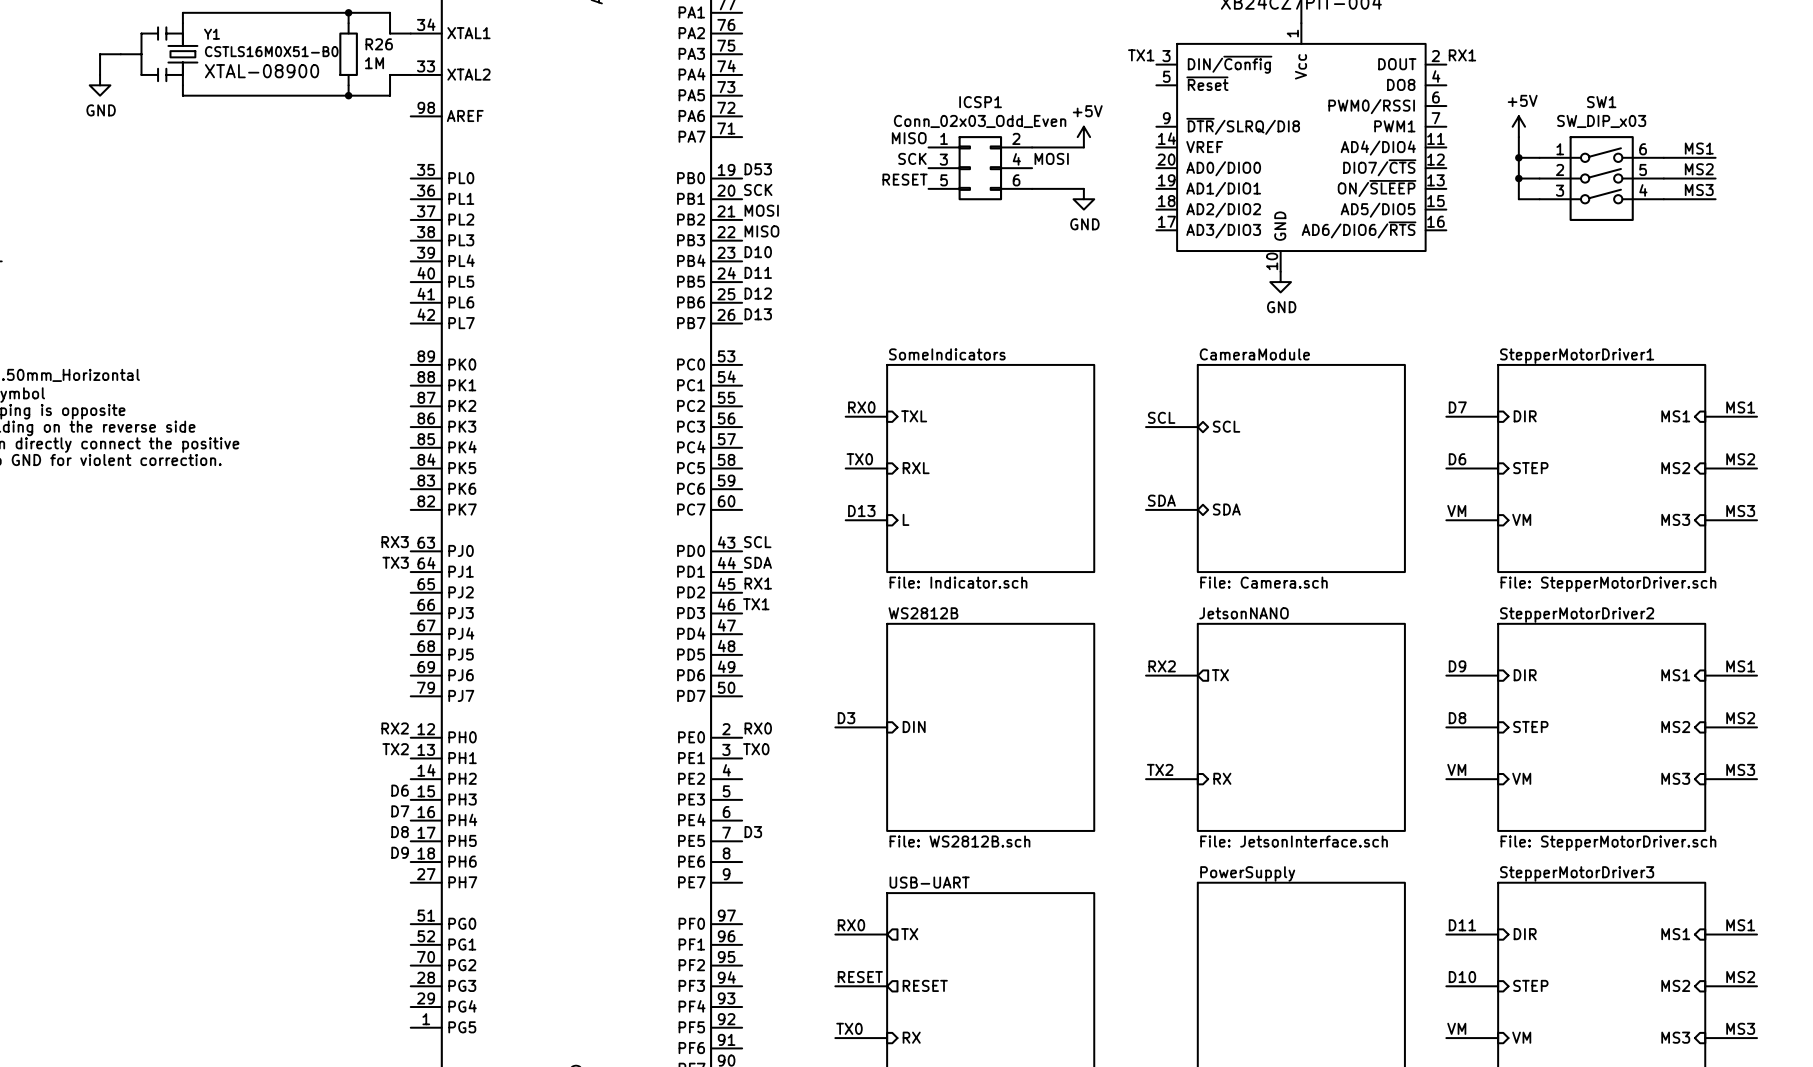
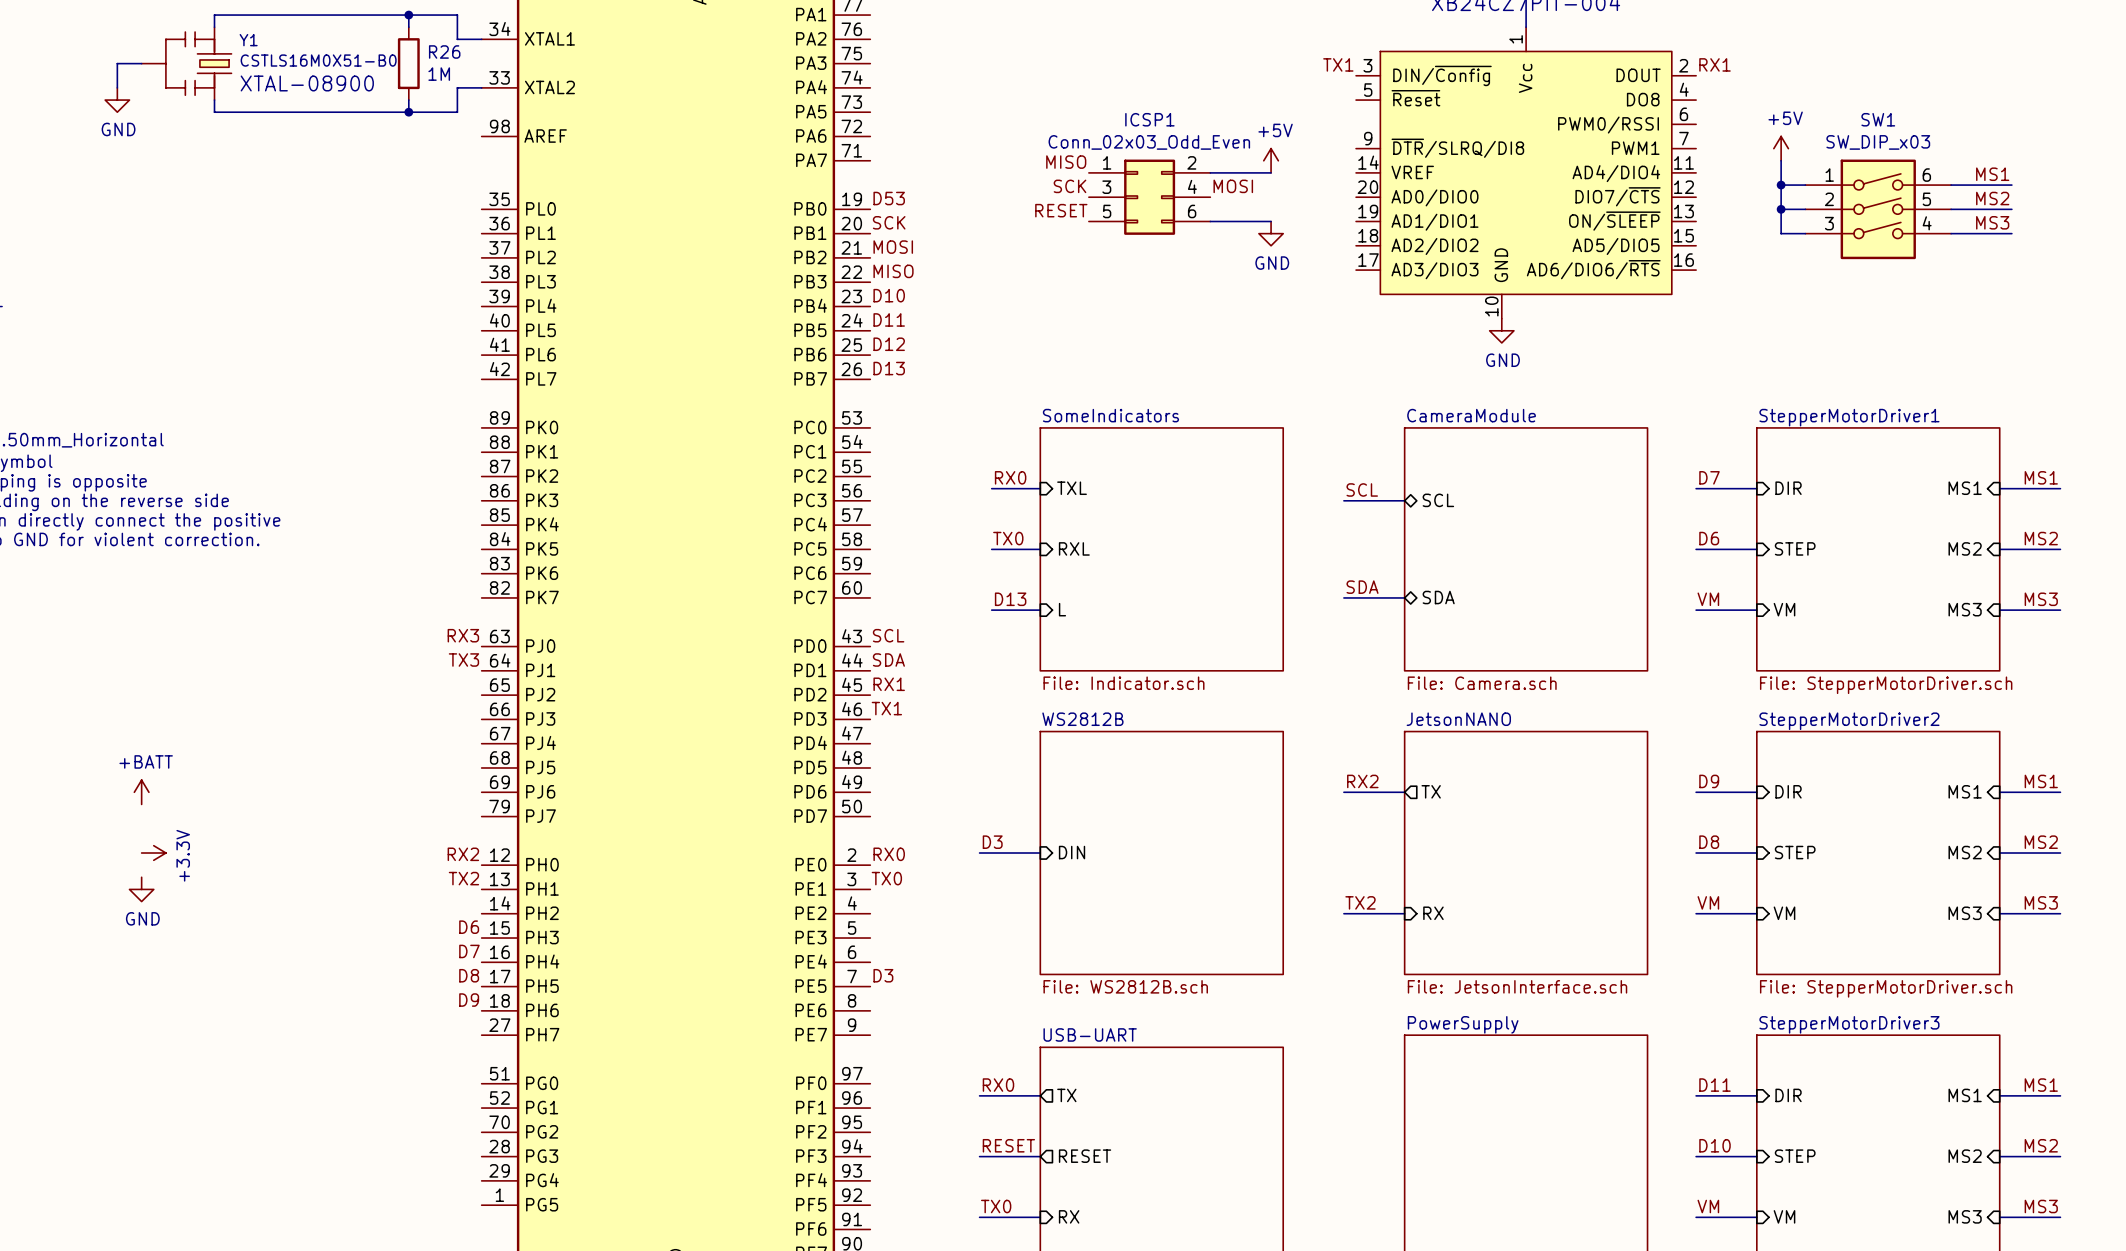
power symbol: none -> +BATT (141, 792)
power symbol: none -> +3.3V (153, 853)
power symbol: none -> GND (141, 889)

